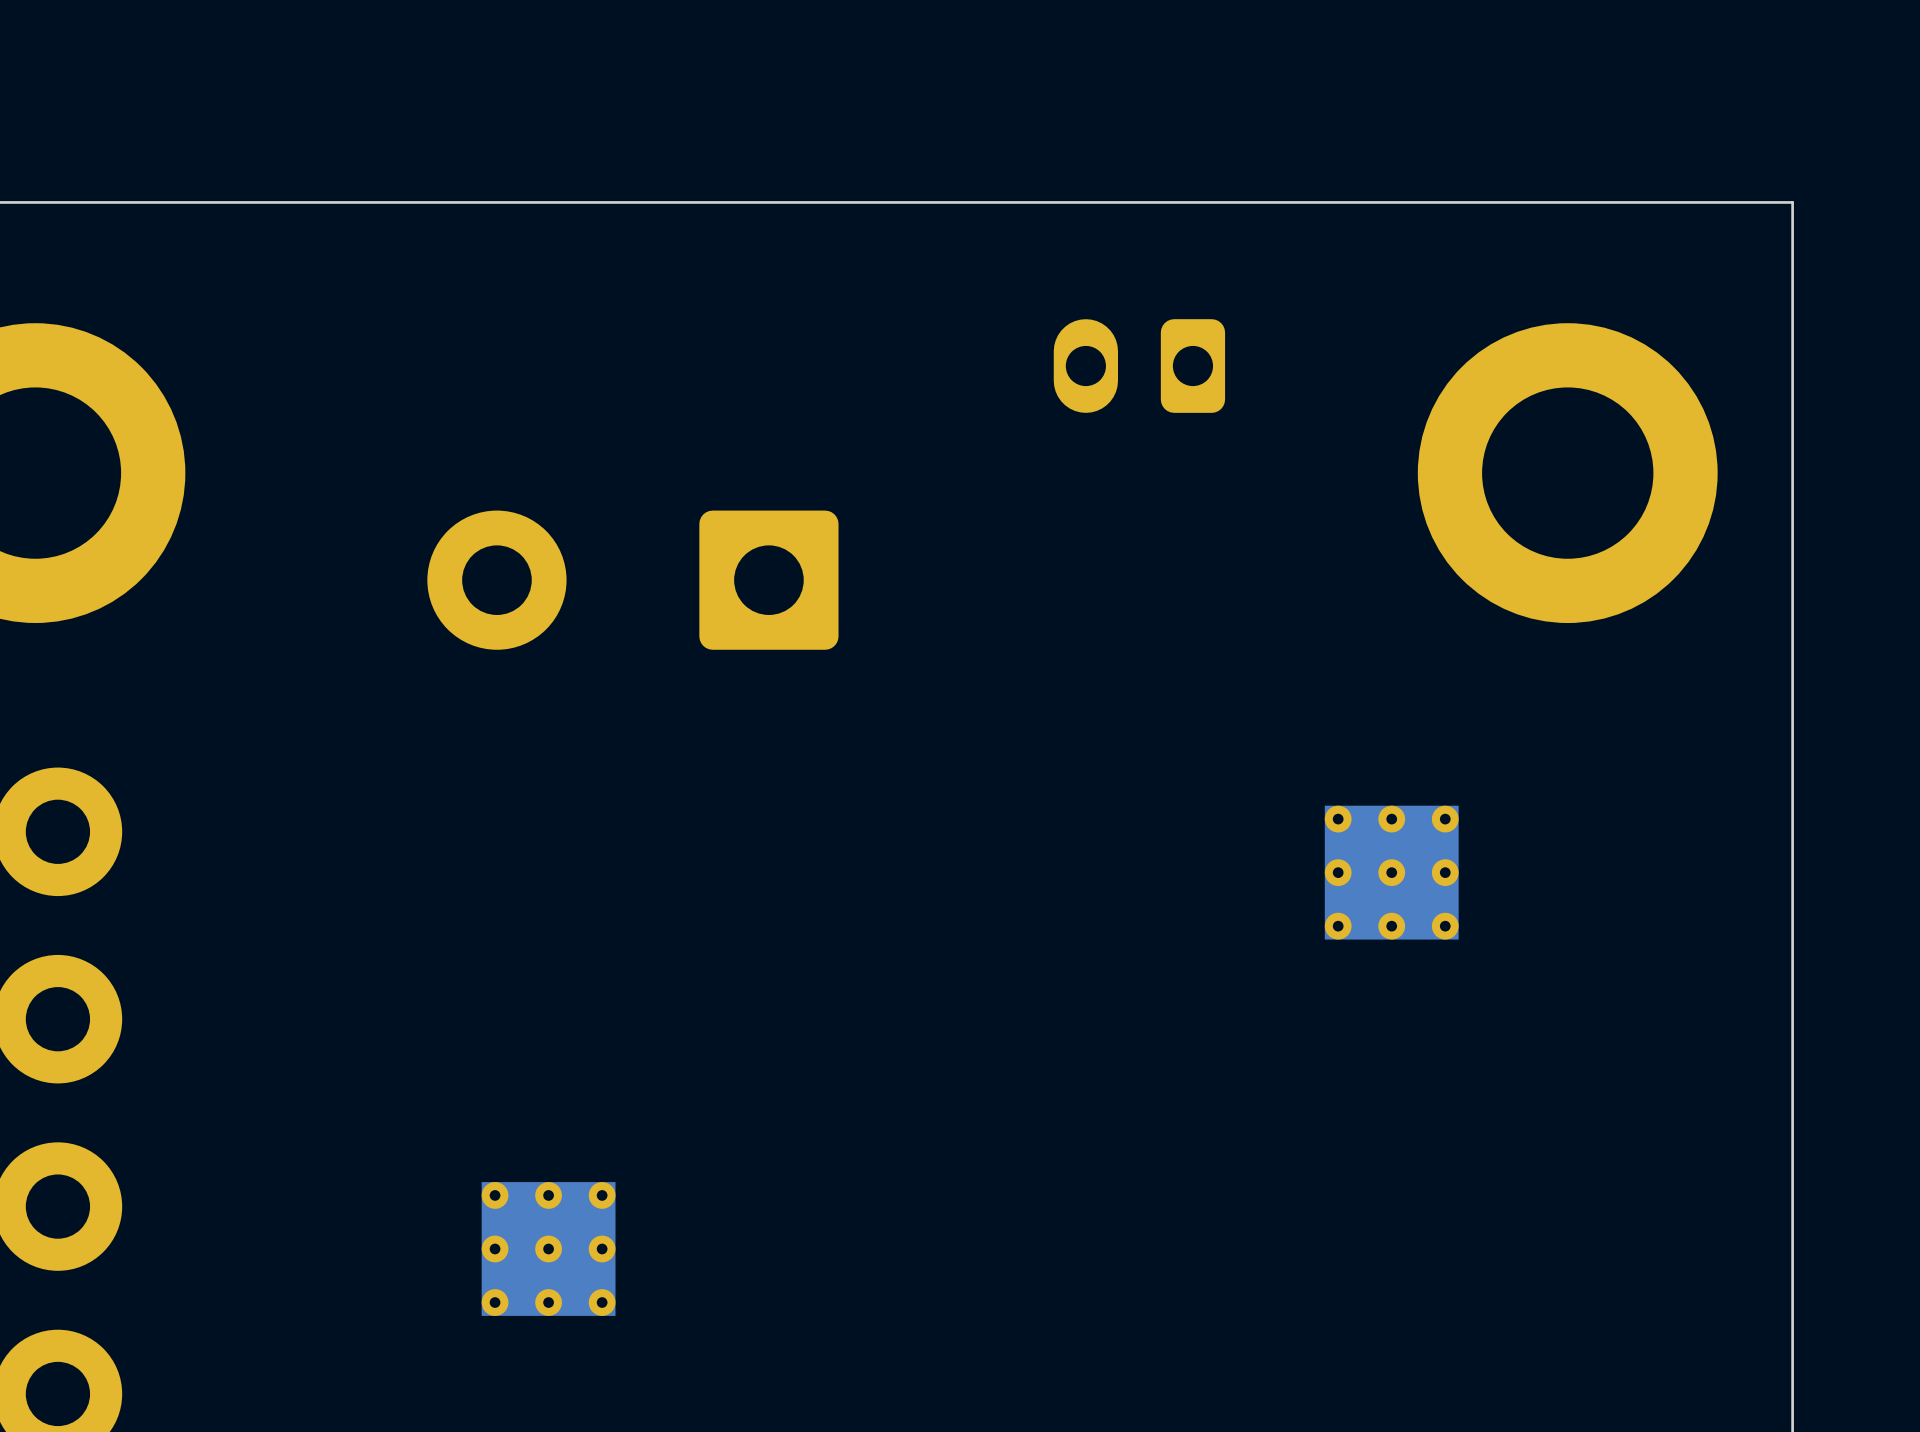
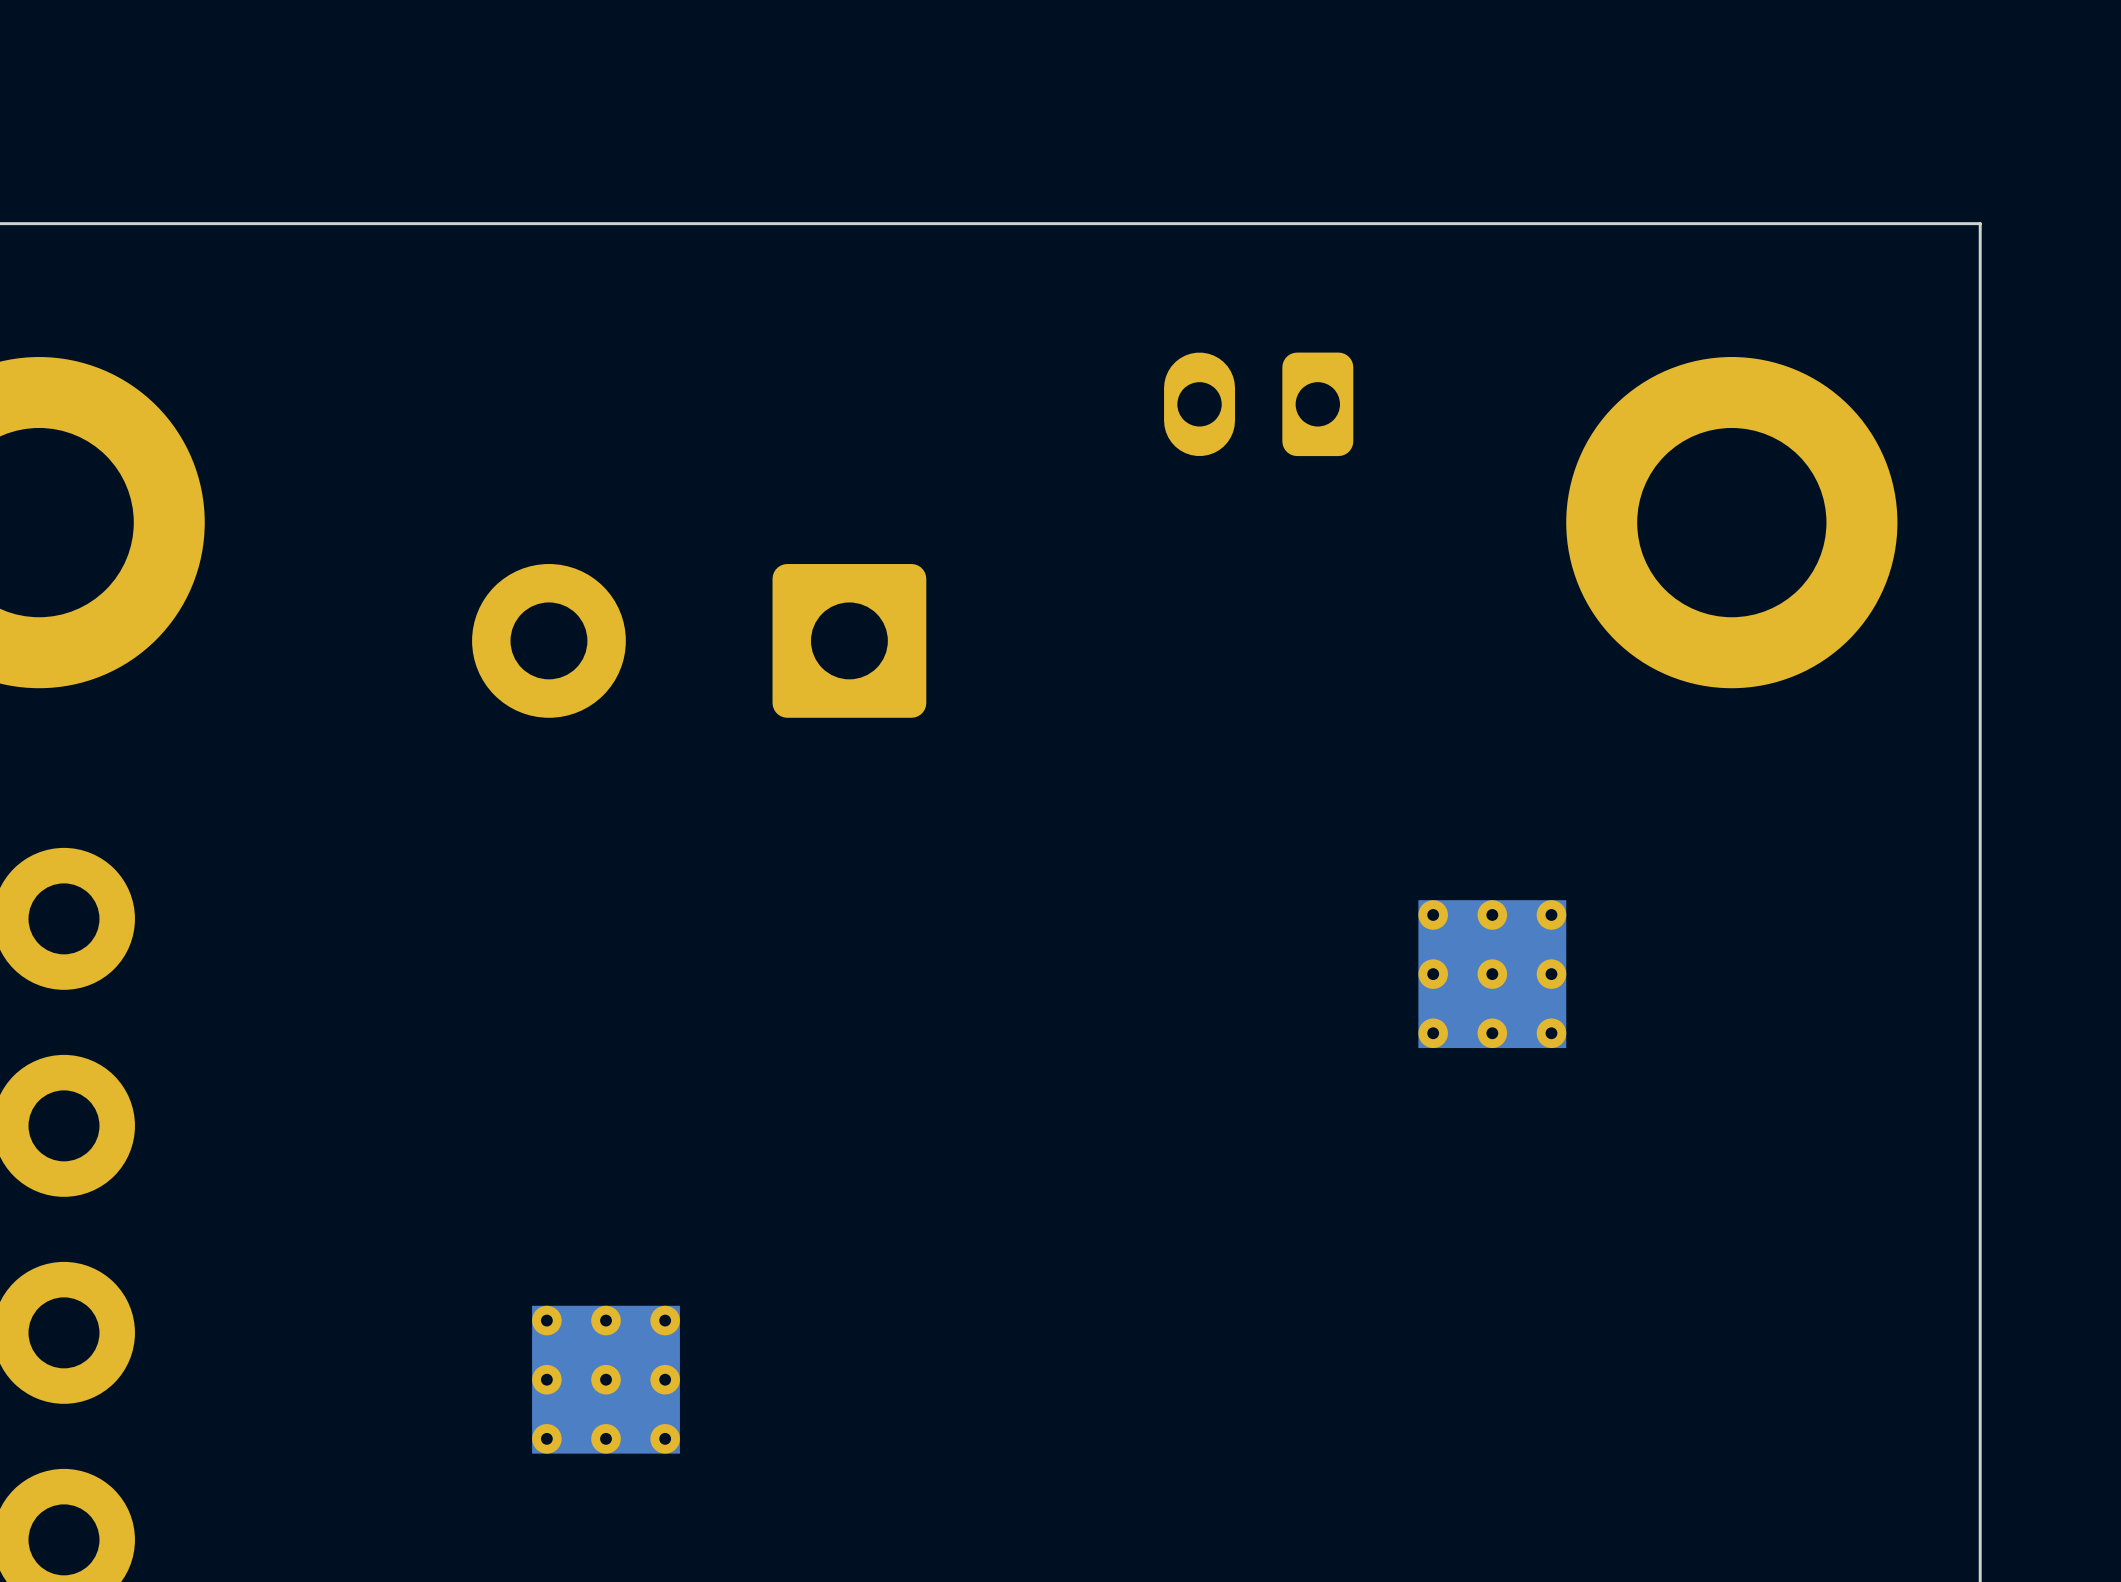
part position: (1391, 872) -> (1492, 974)

